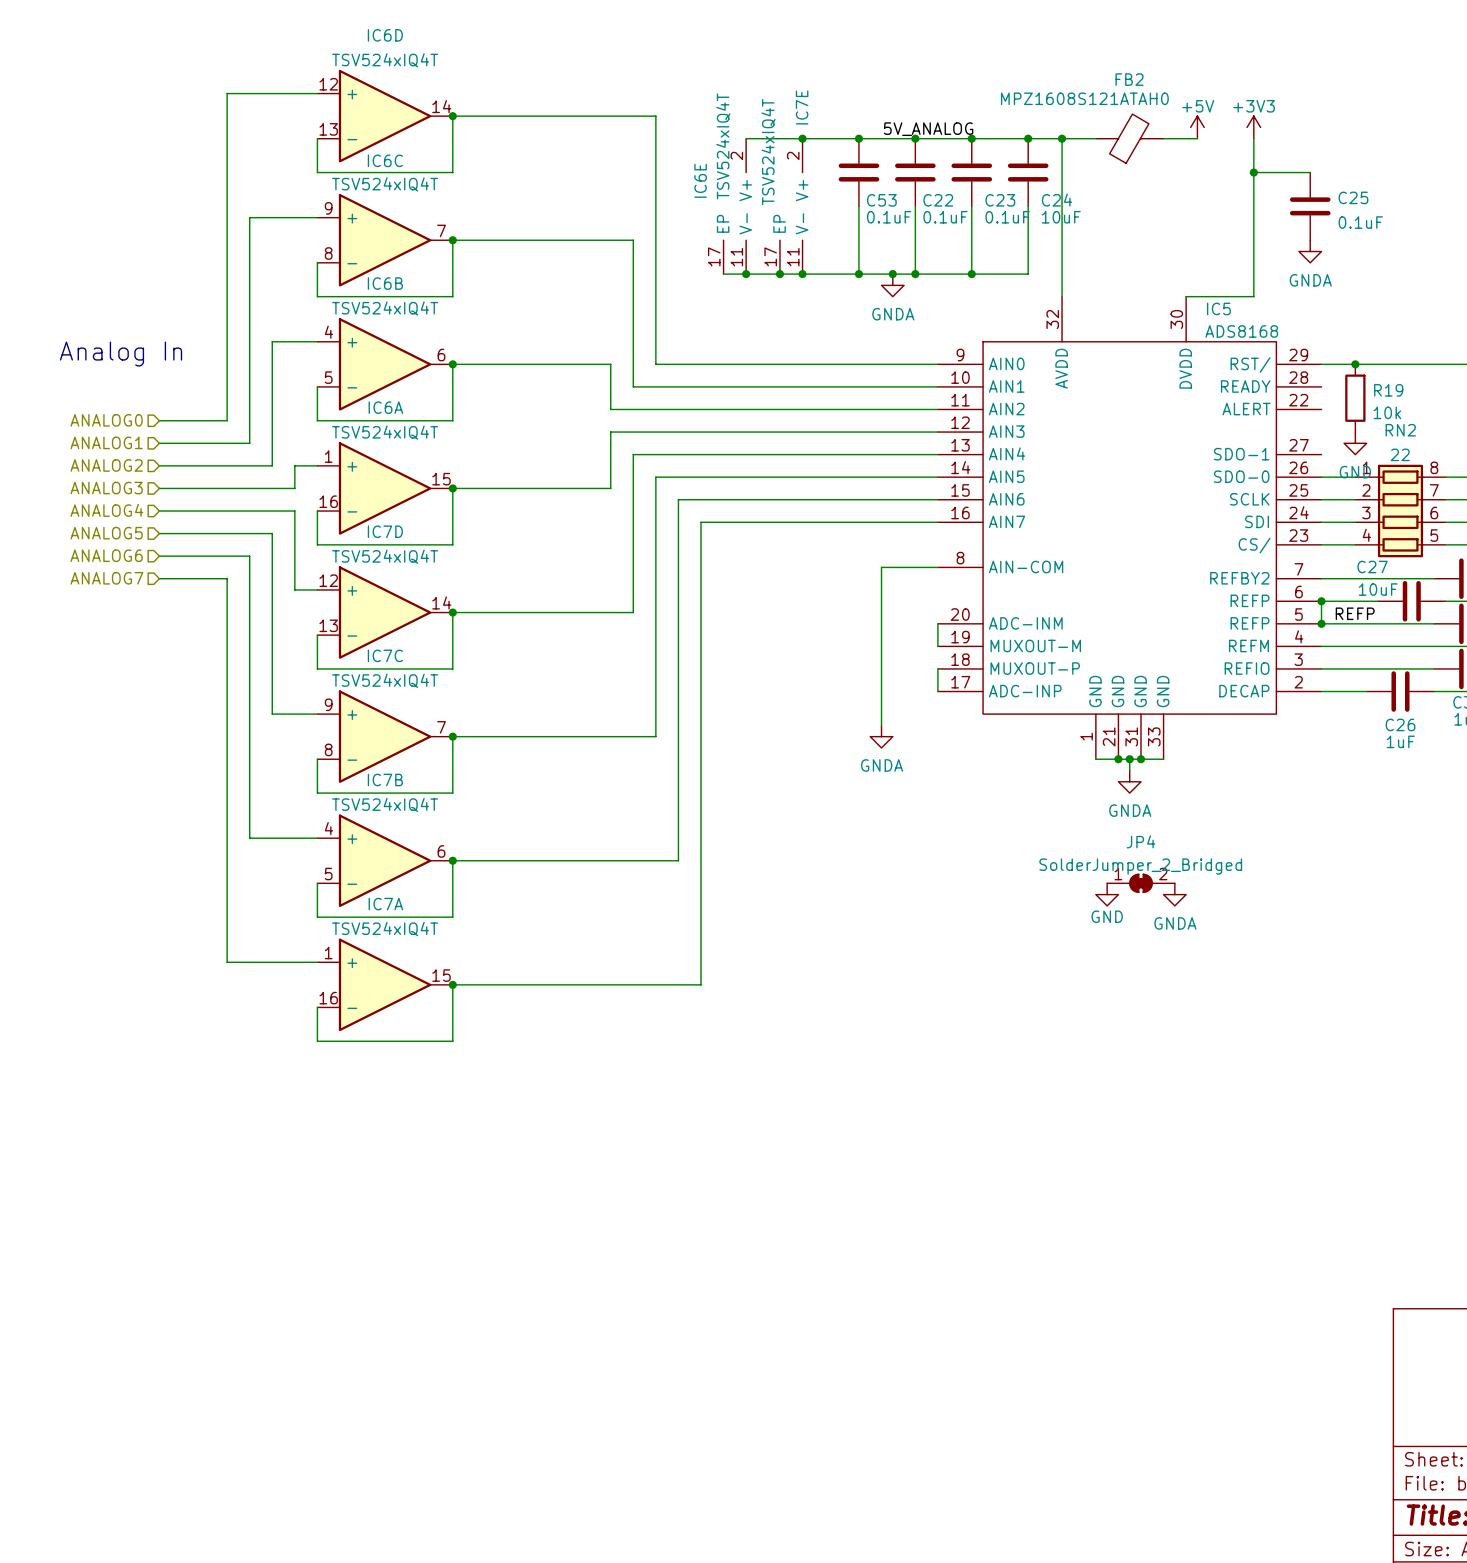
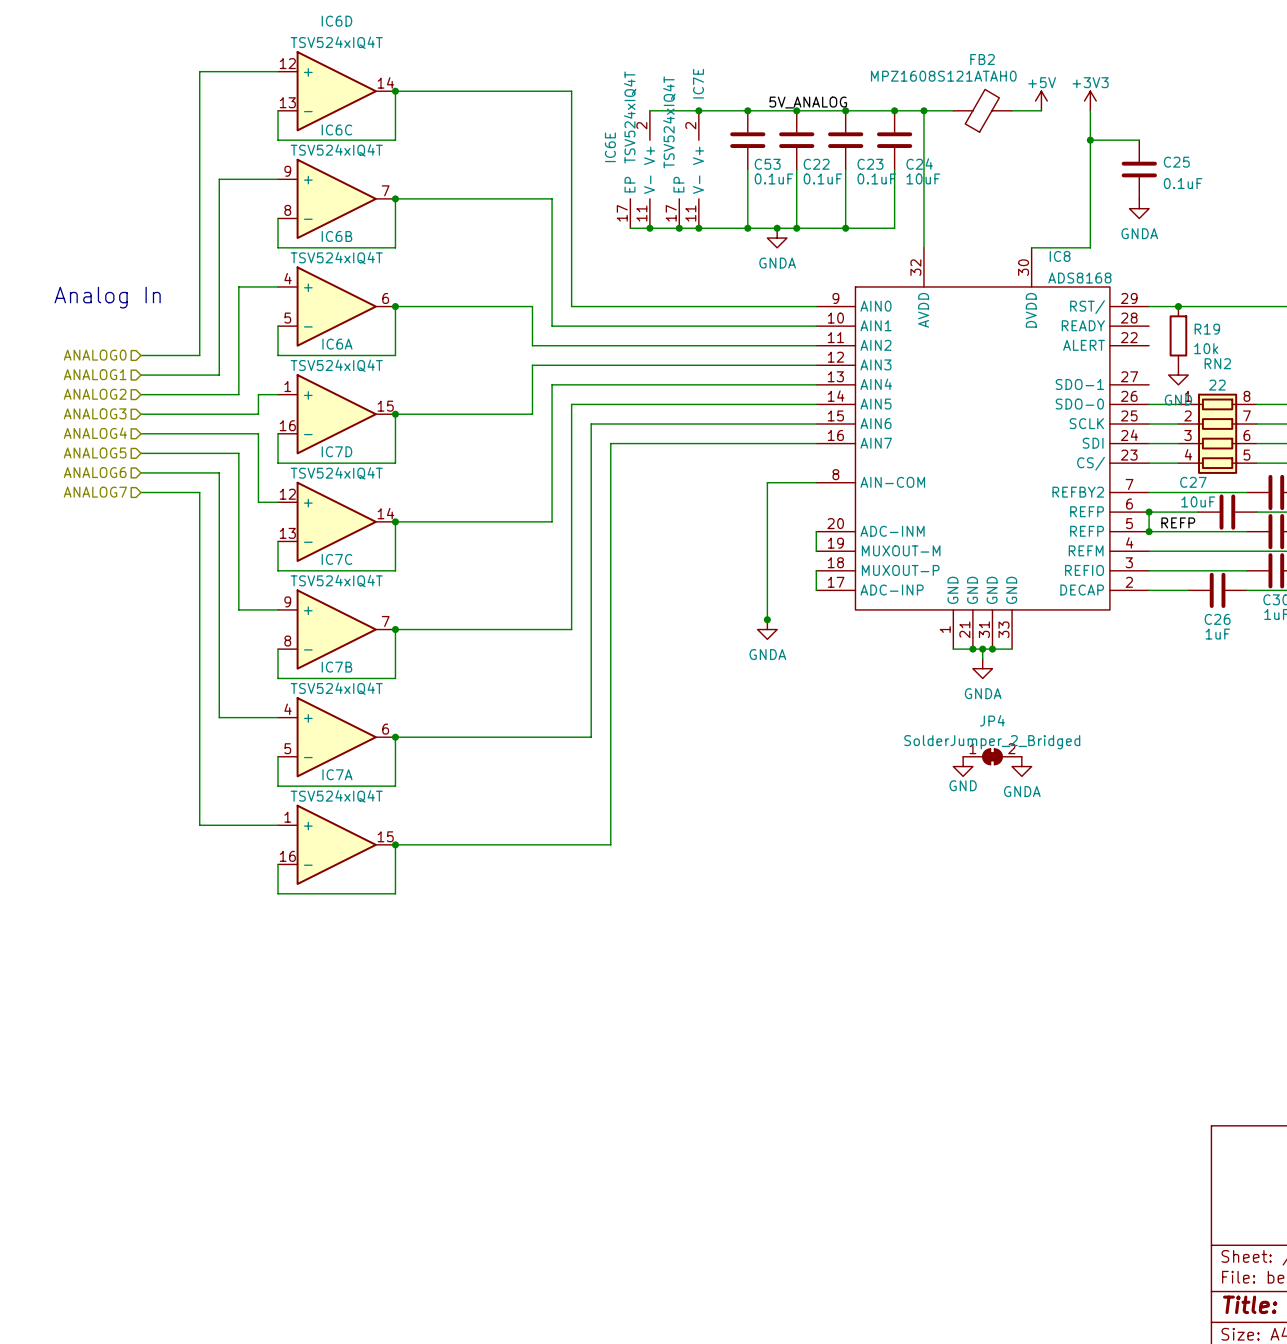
IC5 name: IC5 (1218, 308) -> IC8 (1060, 256)
junction: none -> (767, 619)

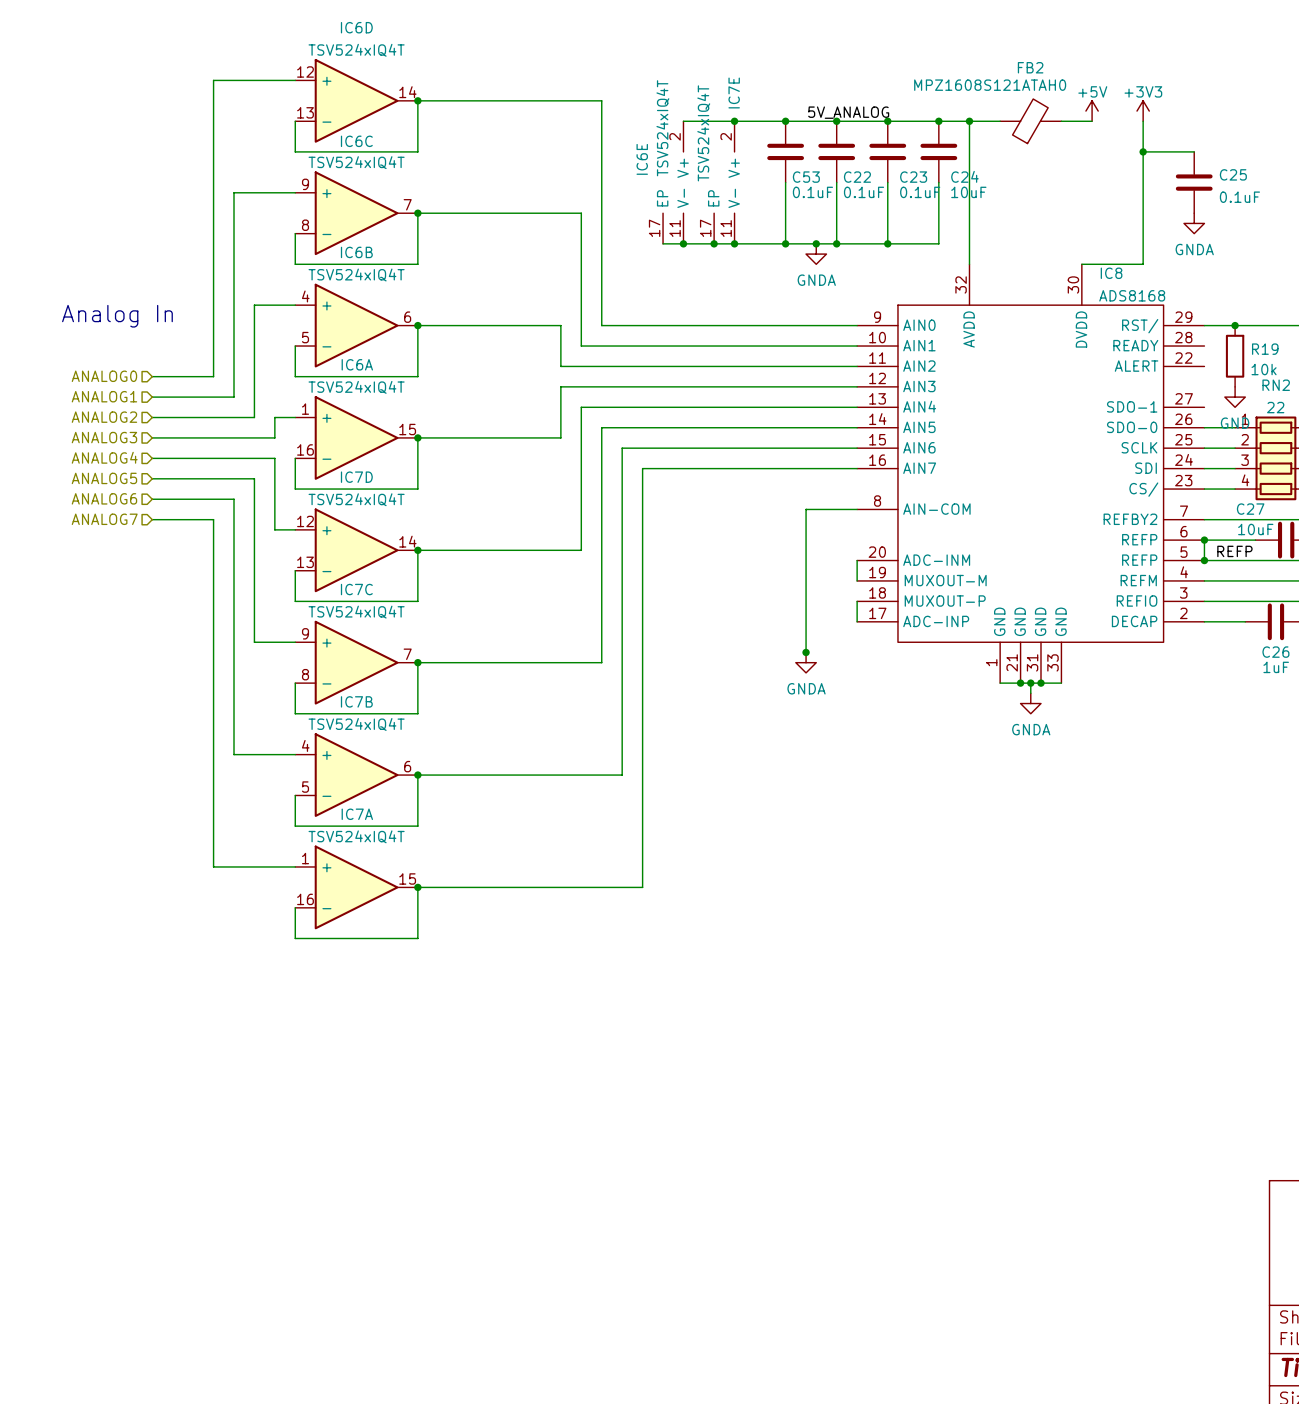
JP4: SolderJumper_2_Bridged (992, 756) -> none
power symbol: GND (963, 766) -> none
power symbol: GNDA (1021, 766) -> none

